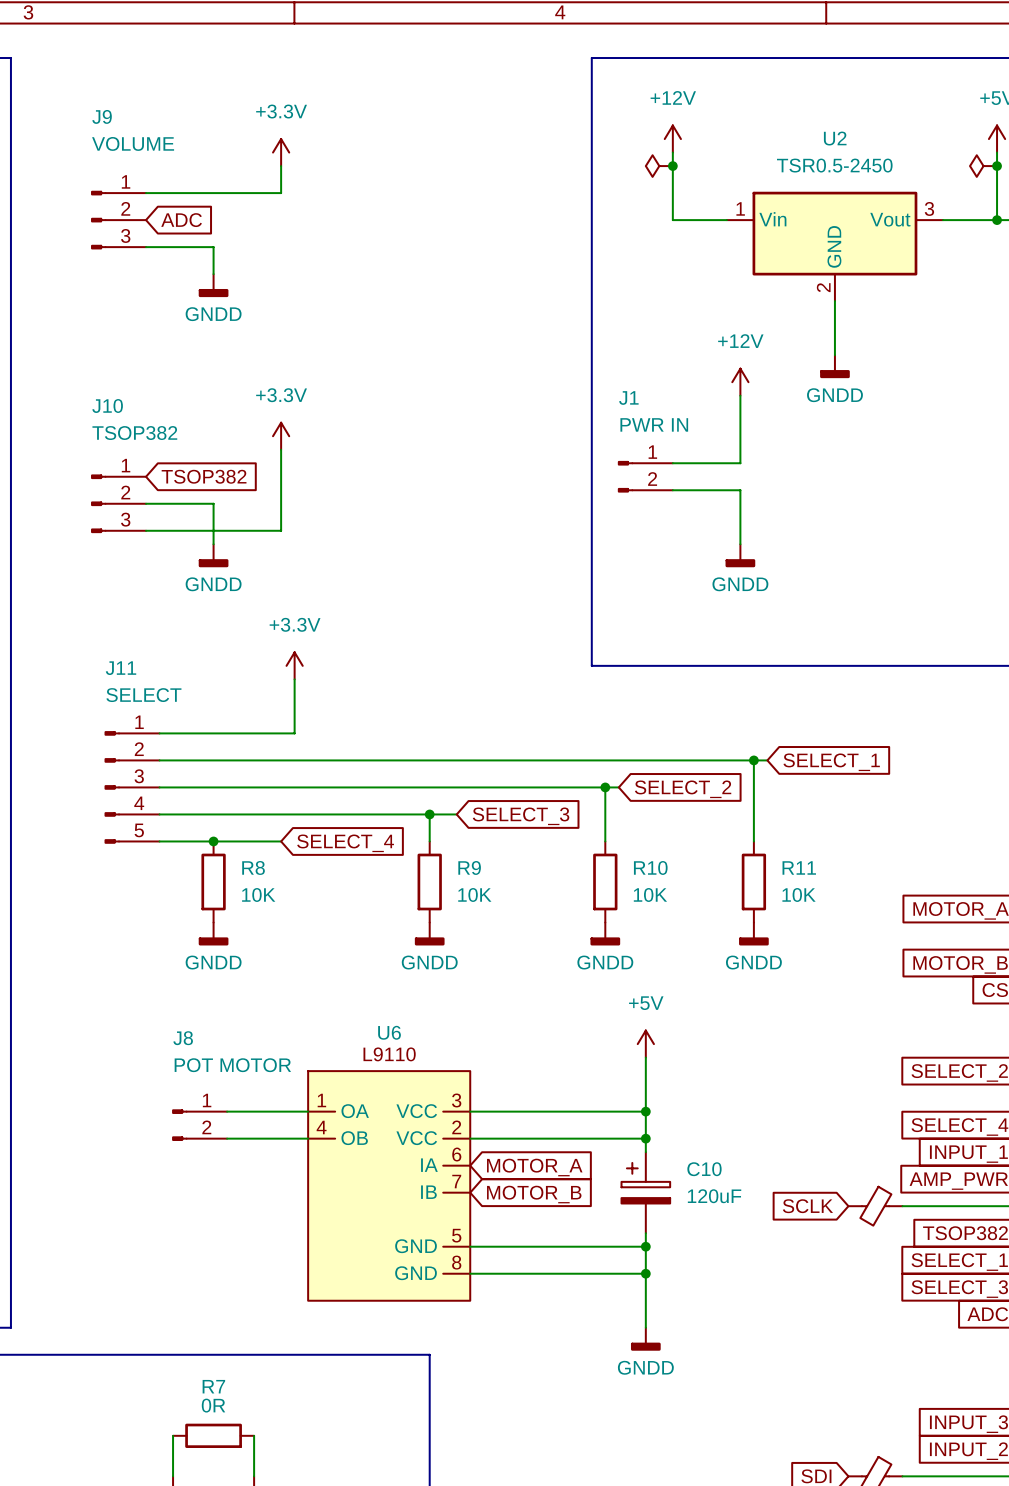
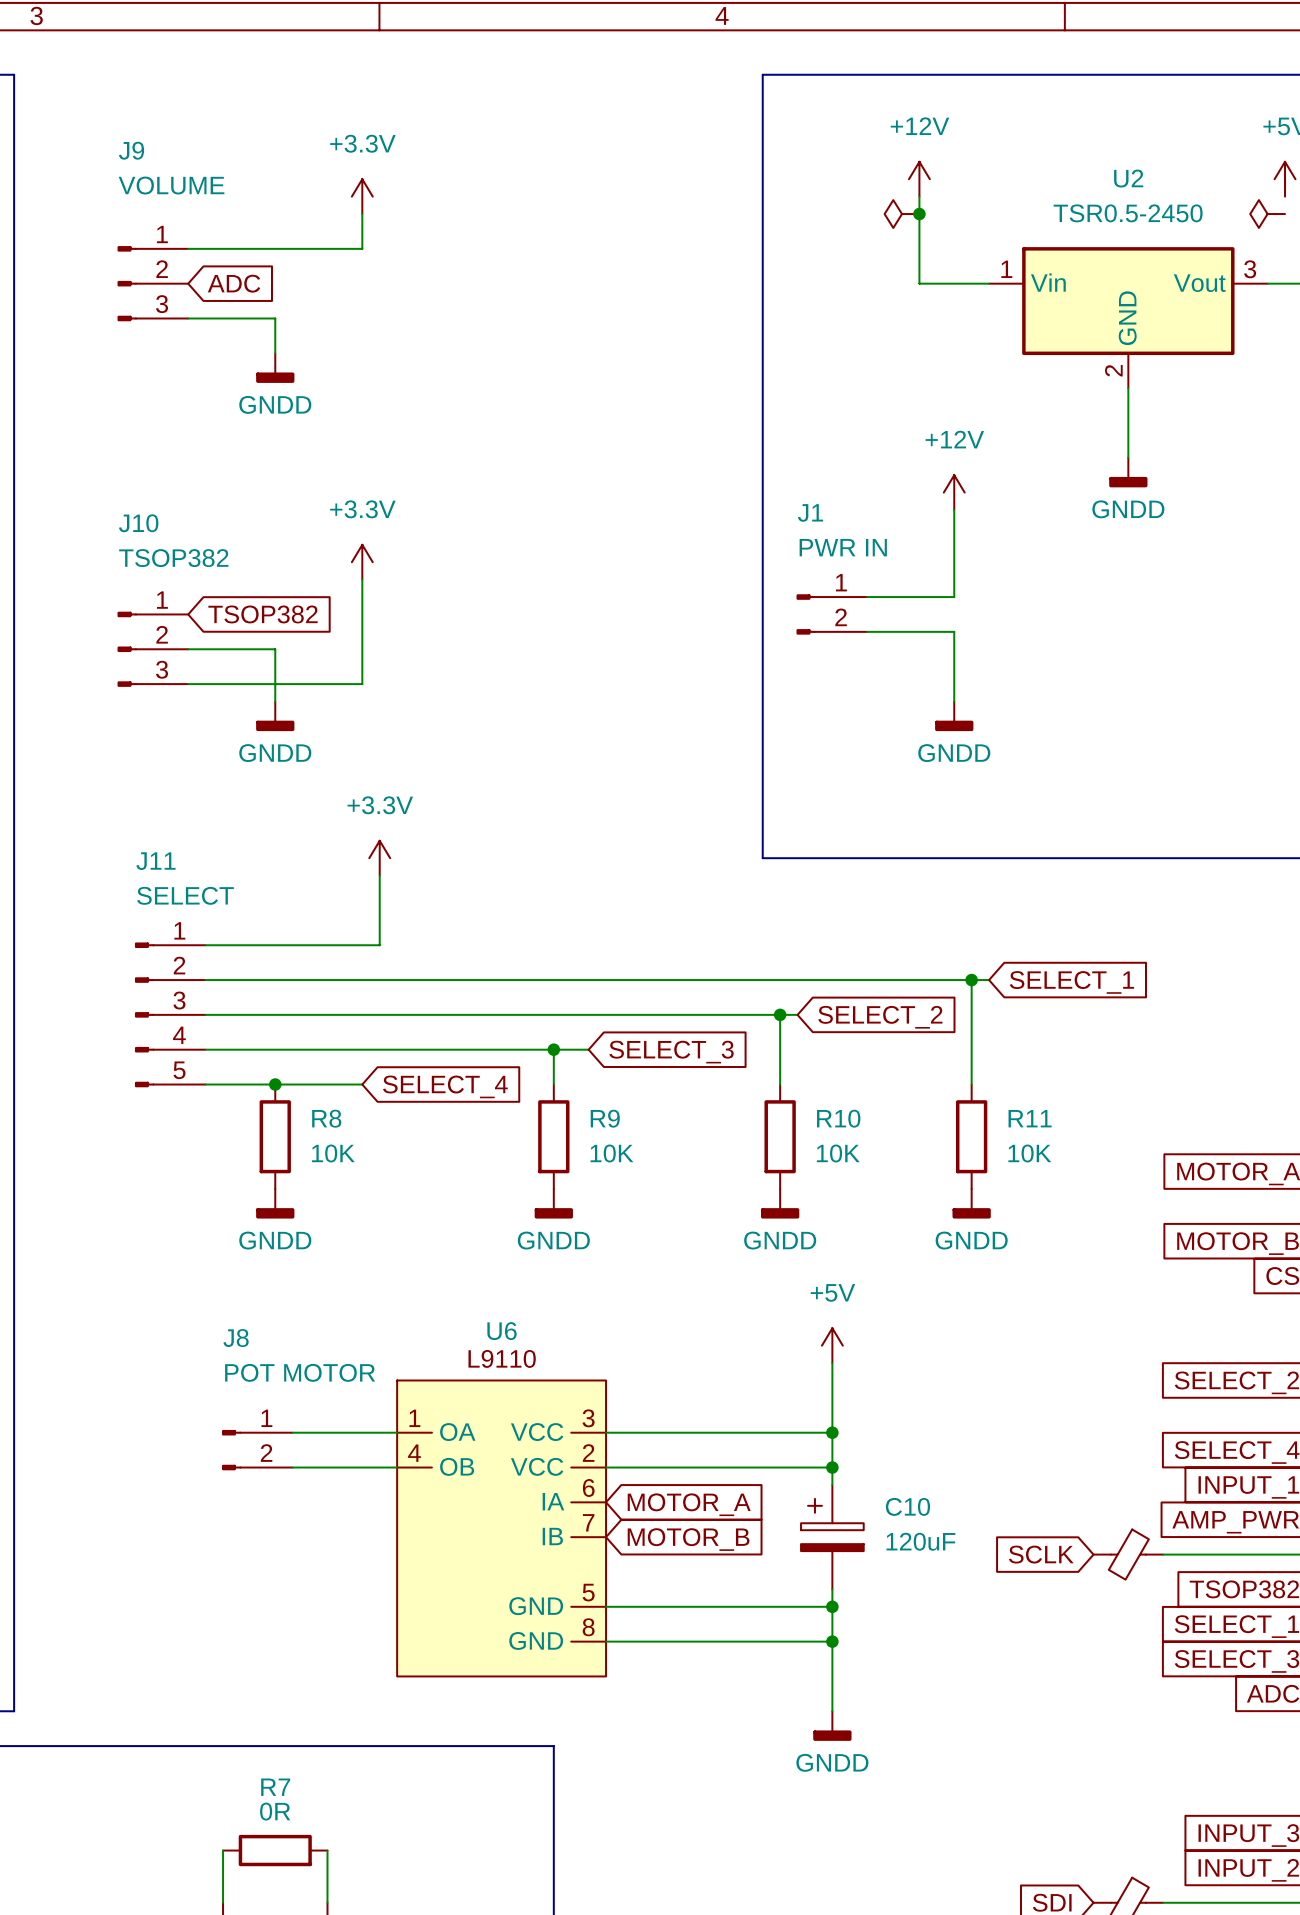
power symbol position: +12V (672, 139) -> +12V (919, 179)
wire: (672, 152) (672, 220) (713, 220) -> (919, 196) (919, 283)
wire: (997, 152) (997, 220) -> none
power symbol position: (659, 166) -> (902, 214)
junction position: (672, 166) -> (919, 214)
junction: (997, 166) -> none
junction: (997, 220) -> none
U2 position: (834, 246) -> (1128, 317)
wire: (834, 301) (834, 355) -> (1128, 388) (1128, 457)
power symbol position: GNDD (834, 366) -> GNDD (1128, 472)

